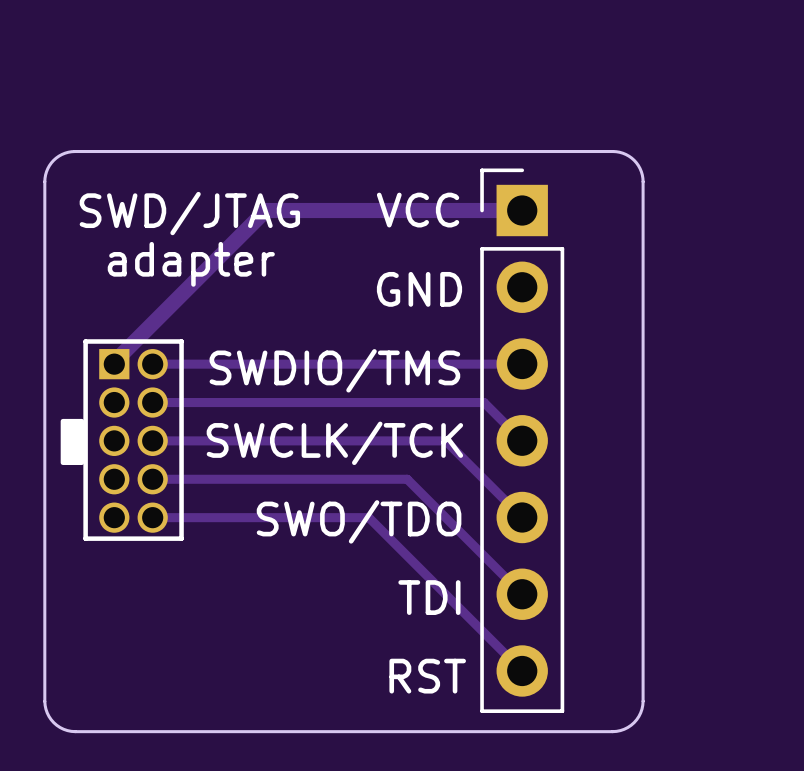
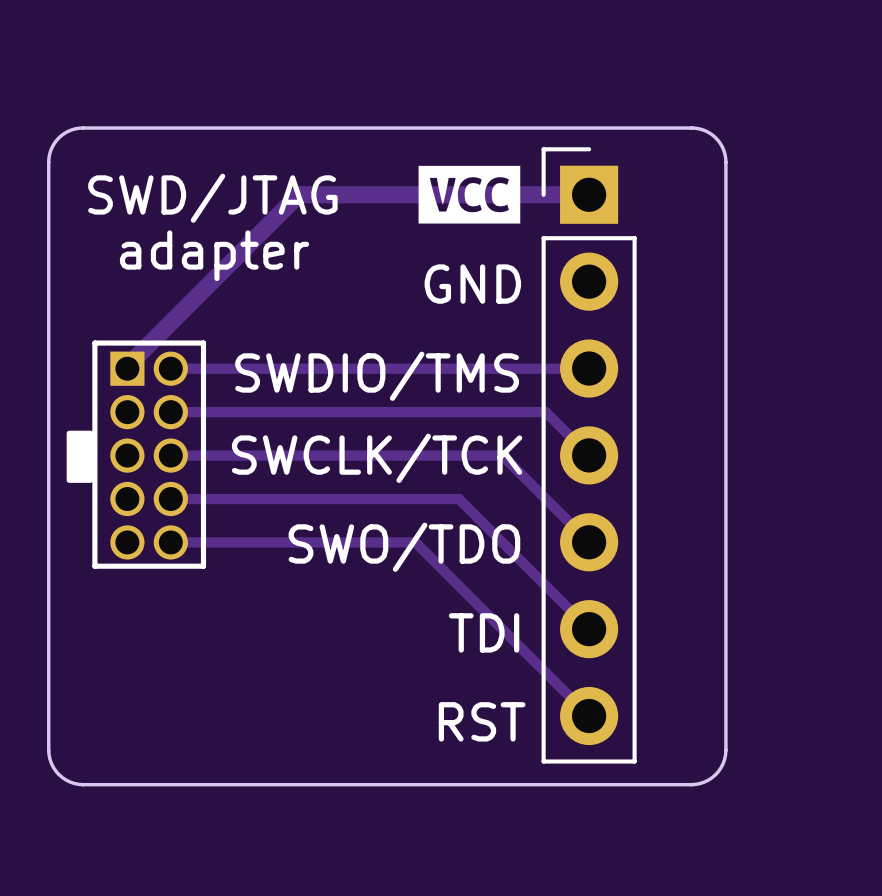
drawing: none -> [418, 165, 521, 224]
text: VCC (418, 210) -> none

